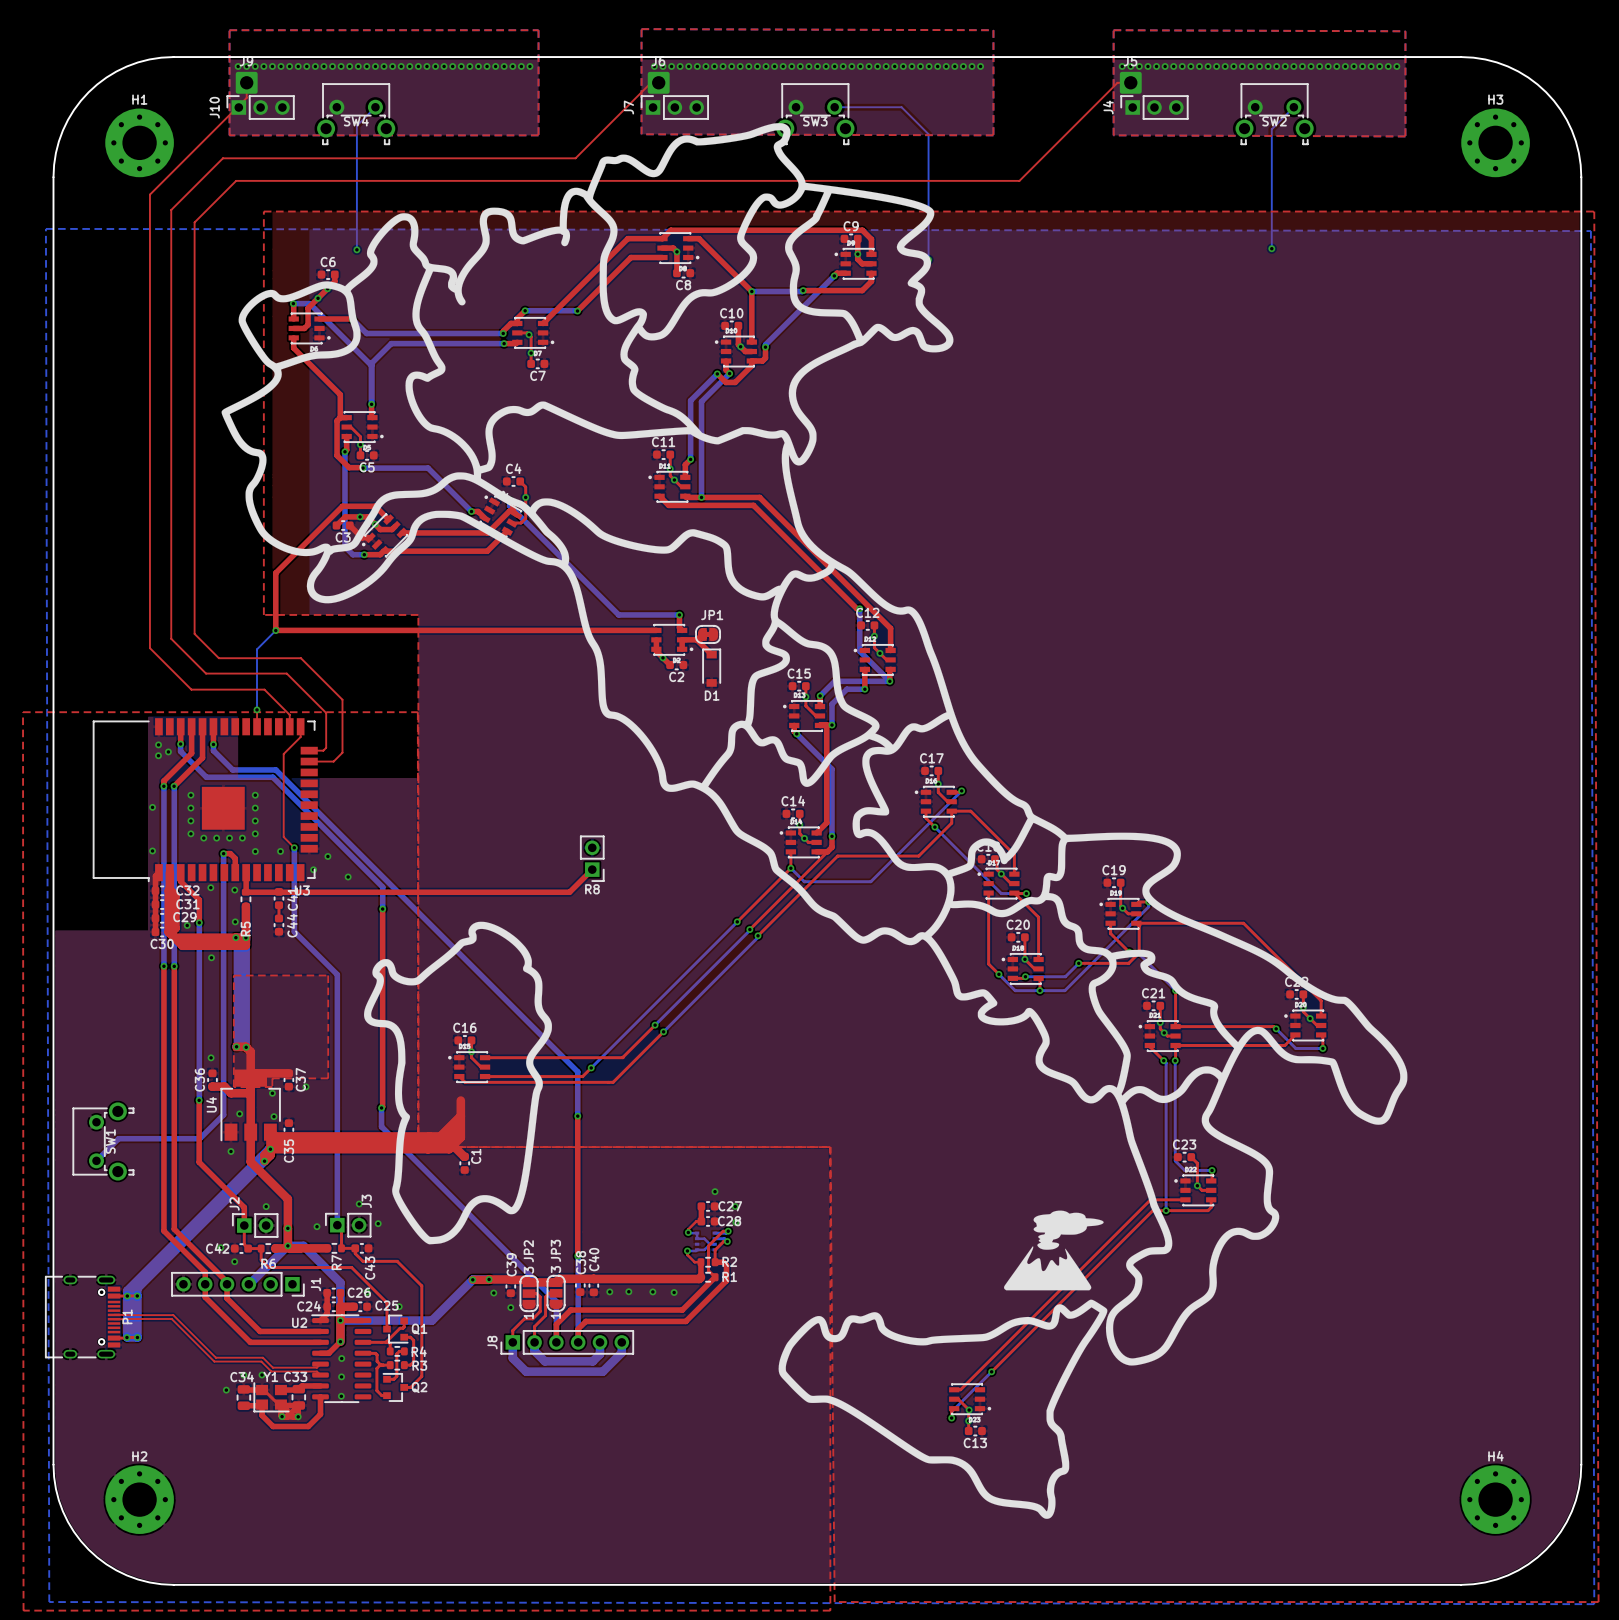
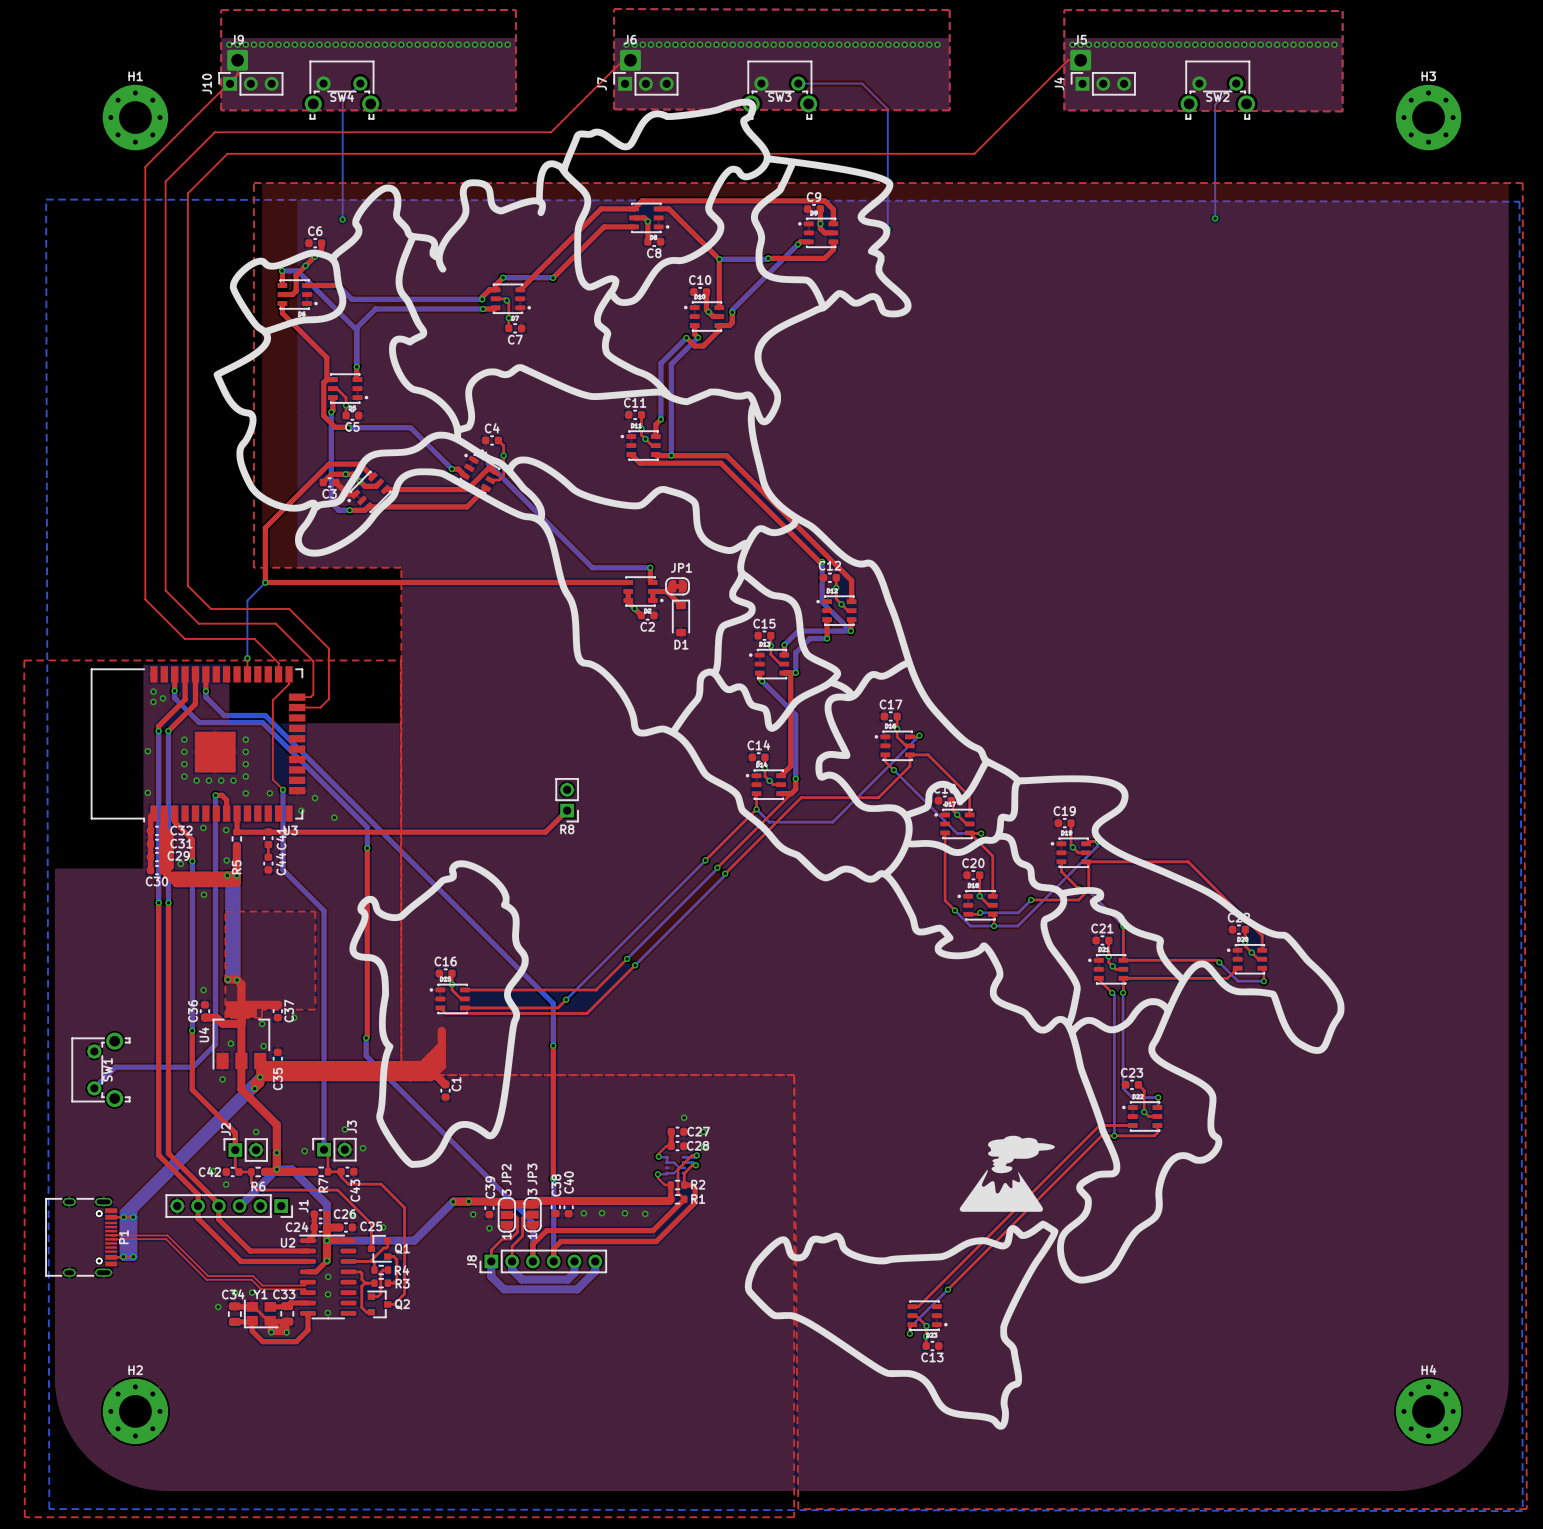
board edge: (173, 57) (1461, 57) (1485, 59) (1507, 66) (1528, 77) (1546, 92) (1560, 110) (1571, 130) (1578, 152) (1581, 177) (1581, 1464) (1578, 1488) (1571, 1511) (1560, 1531) (1546, 1549) (1528, 1564) (1507, 1575) (1485, 1582) (1461, 1584) (173, 1584) (149, 1582) (126, 1575) (106, 1564) (88, 1549) (74, 1531) (62, 1511) (55, 1488) (53, 1464) (54, 164) (58, 141) (67, 119) (80, 100) (97, 84) (116, 71) (137, 62) (173, 57) -> none

